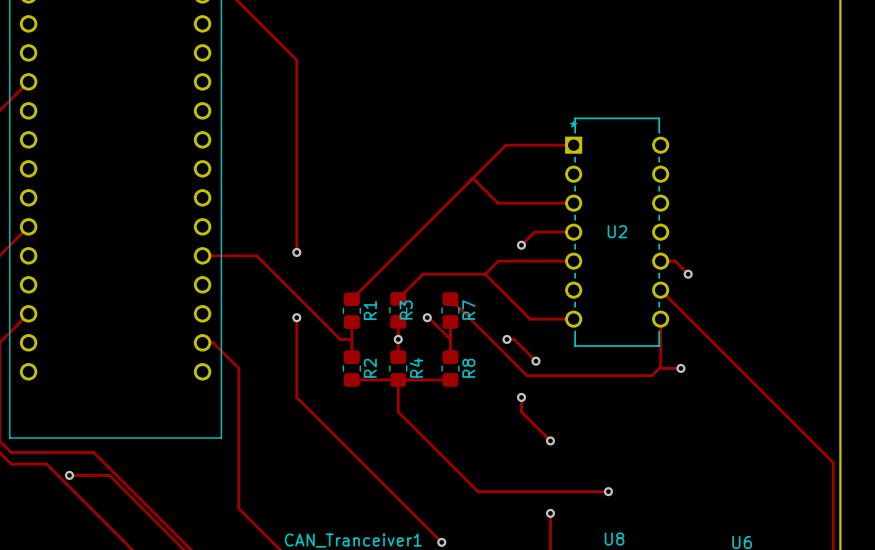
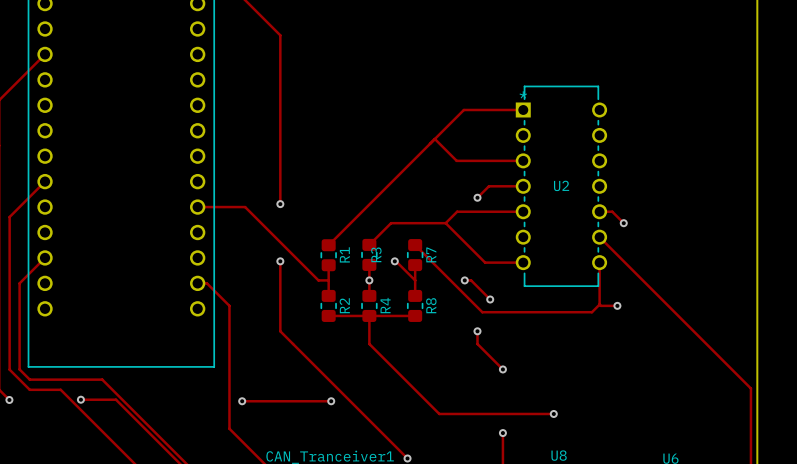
track: none -> (242, 401) (331, 401)
via: none -> (242, 401)
via: none -> (331, 401)

